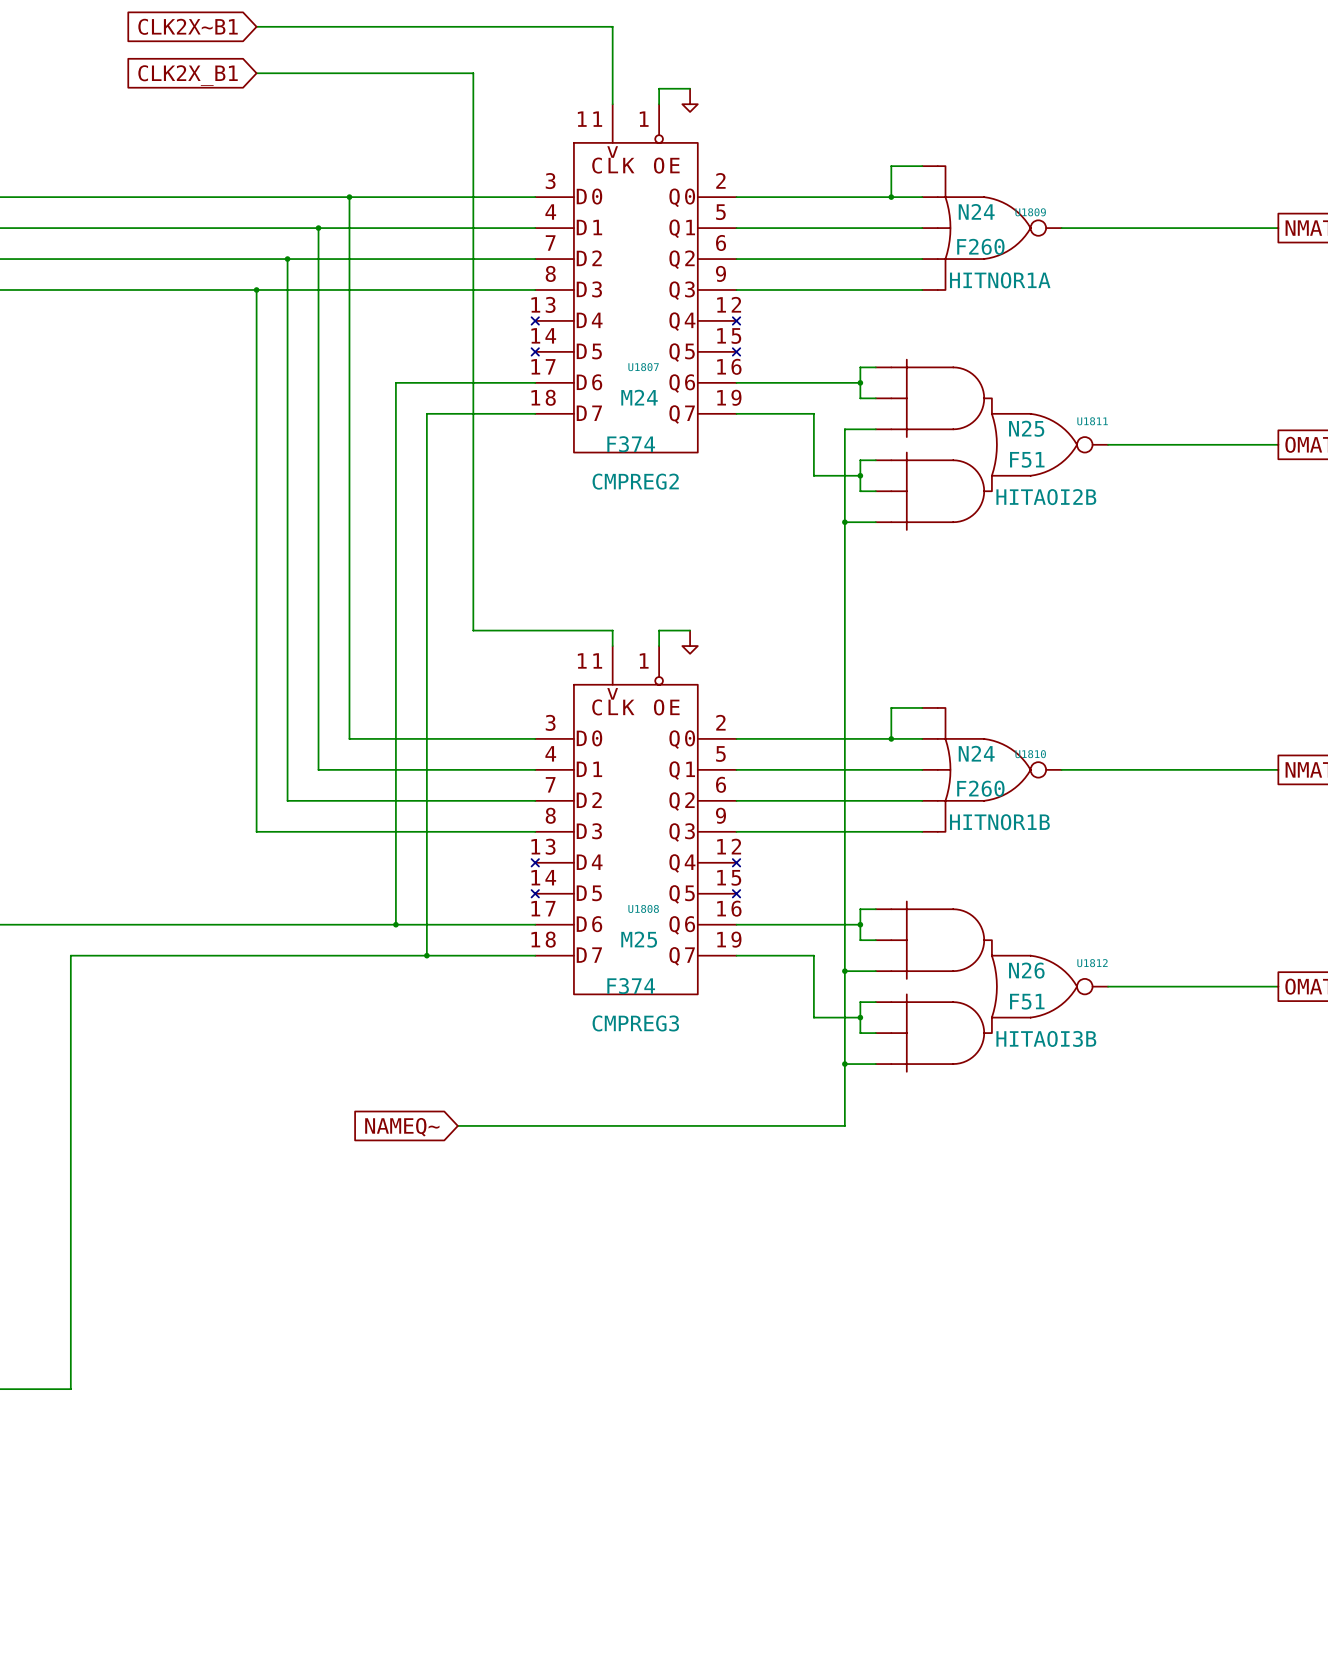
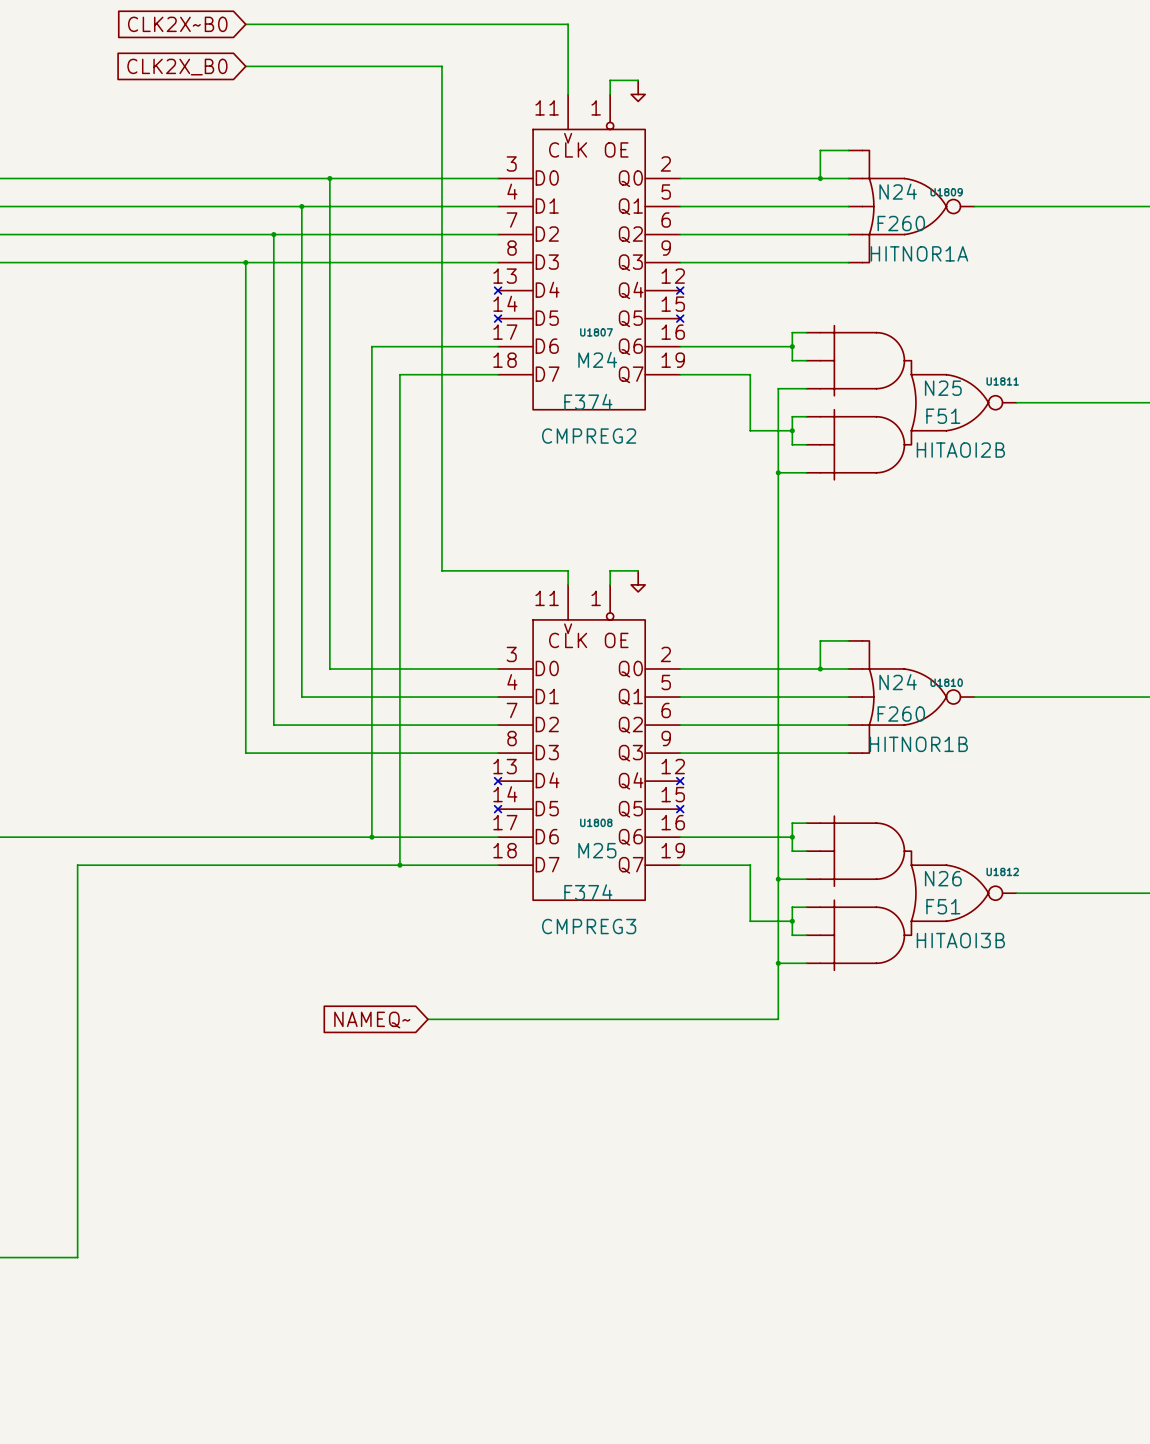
global label: CLK2X~B1 (188, 26) -> CLK2X~B0 (177, 24)
global label: CLK2X_B1 (188, 75) -> CLK2X_B0 (177, 67)

